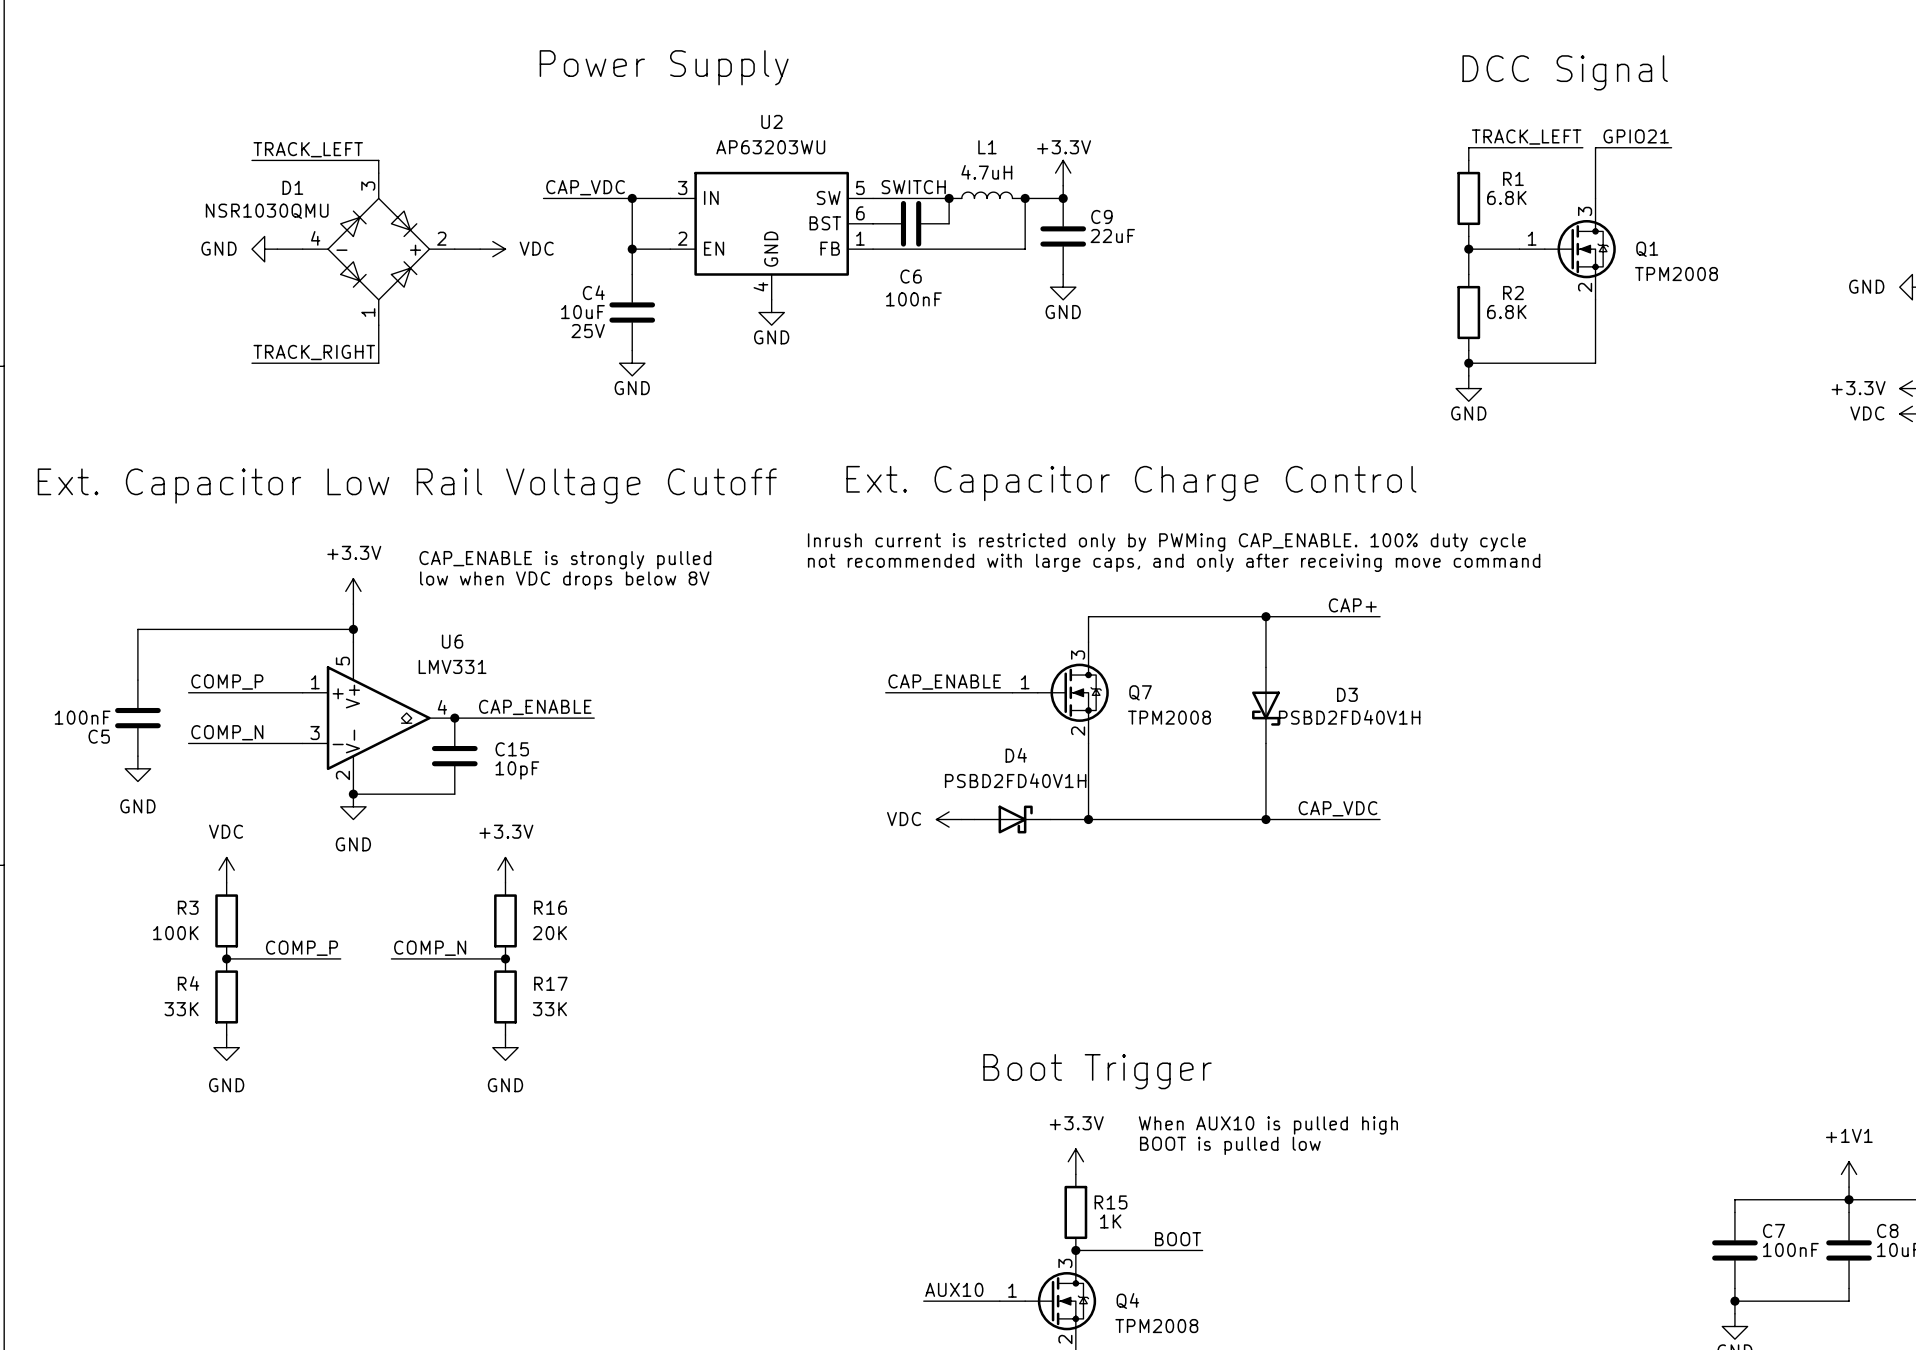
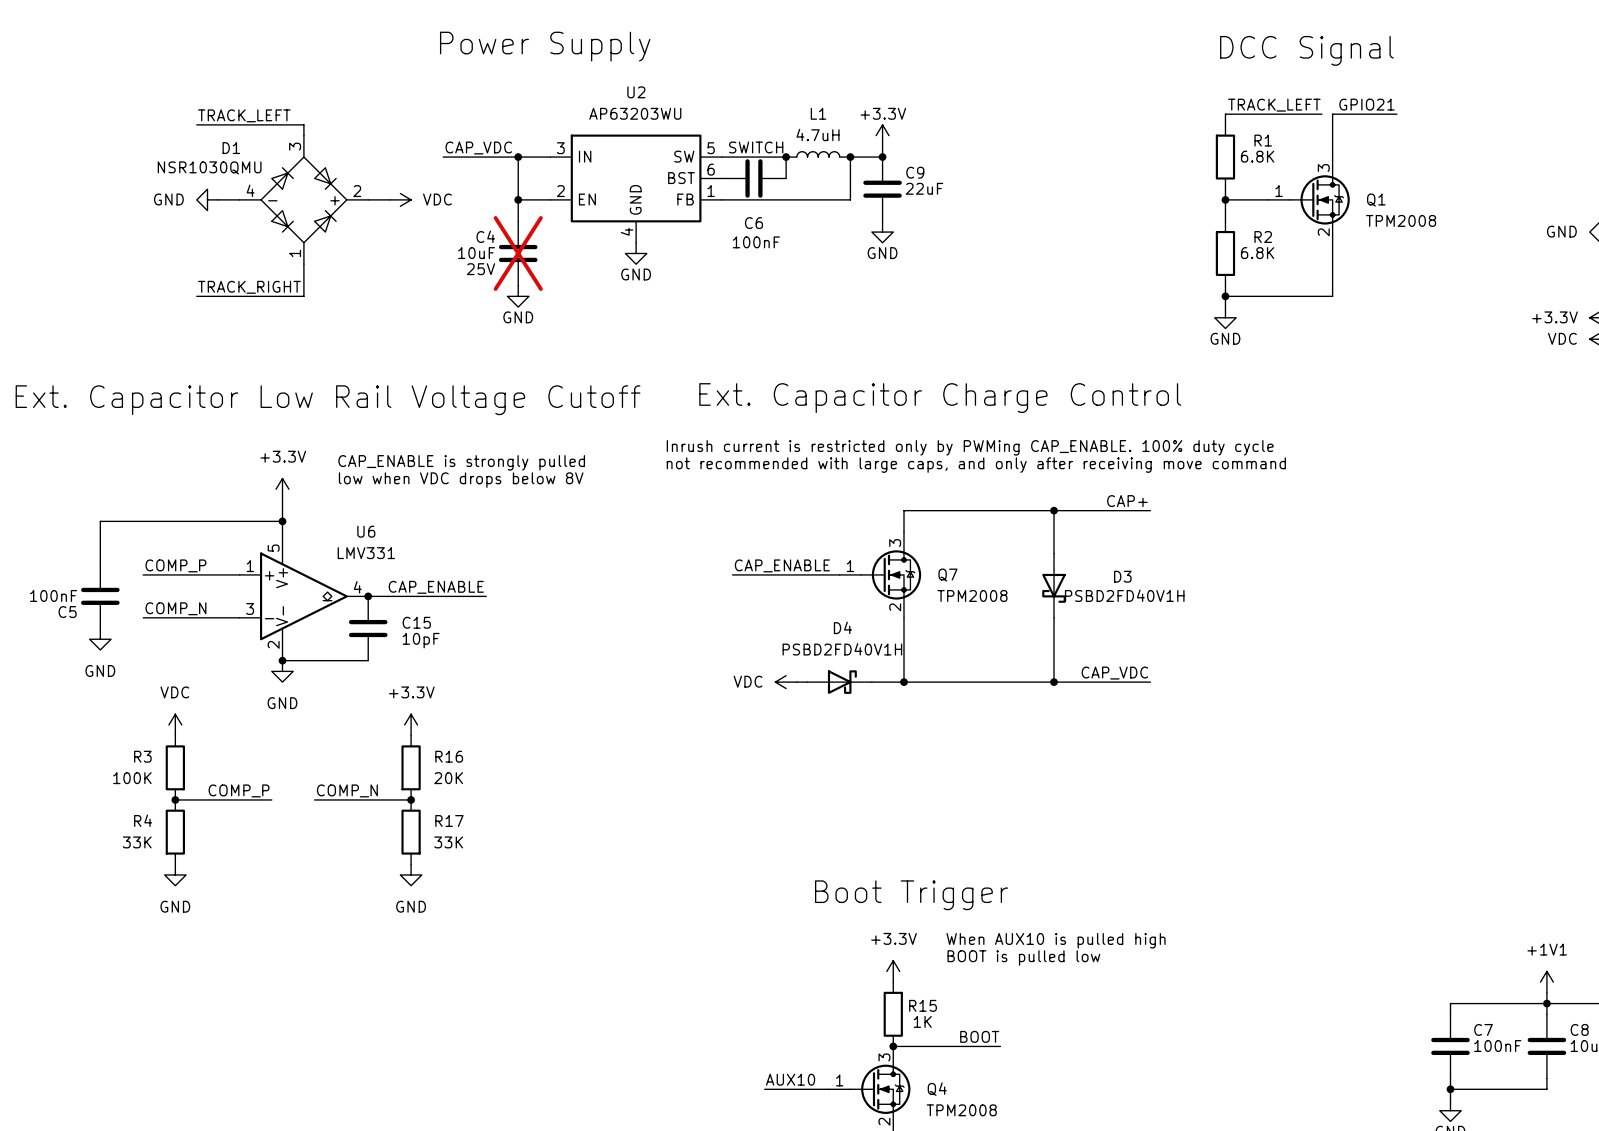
C4 do-not-place cross: none -> (518, 253)

